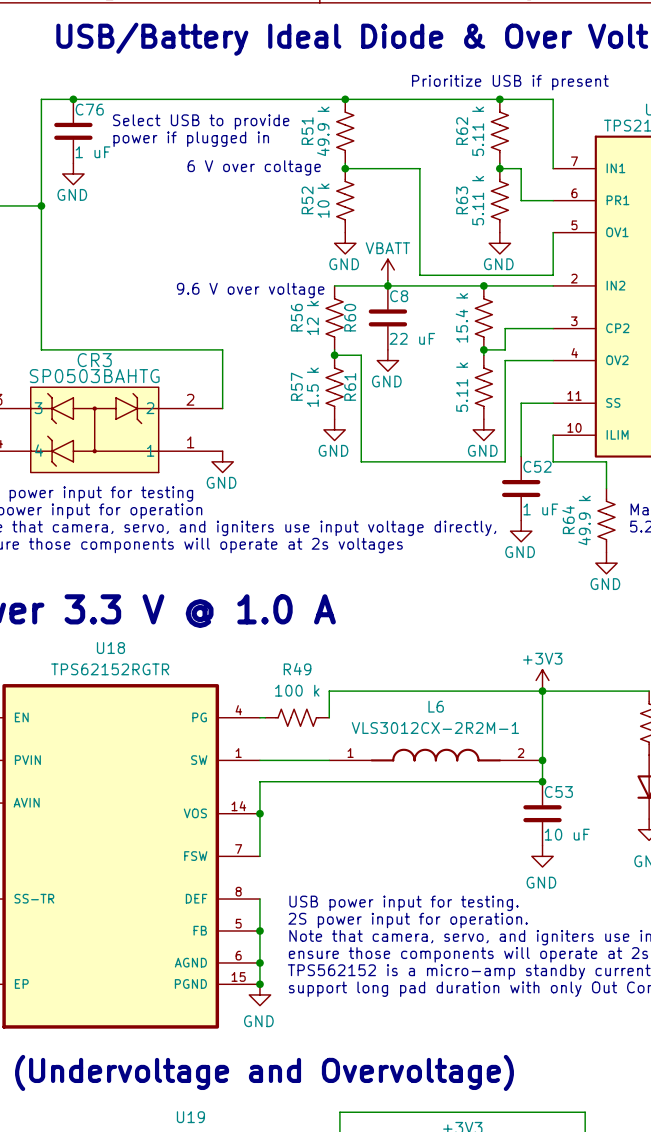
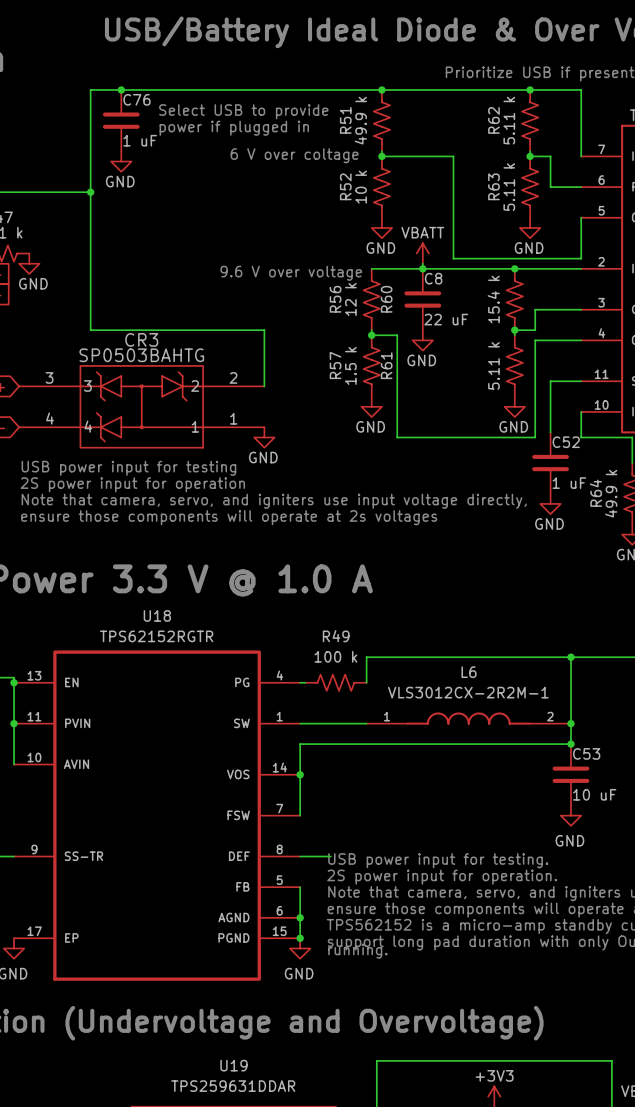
power symbol: +3V3 (542, 680) -> none
wire: (259, 899) (259, 930) -> (300, 856) (330, 856)
junction: (259, 930) -> none
text: none -> running. (357, 951)

